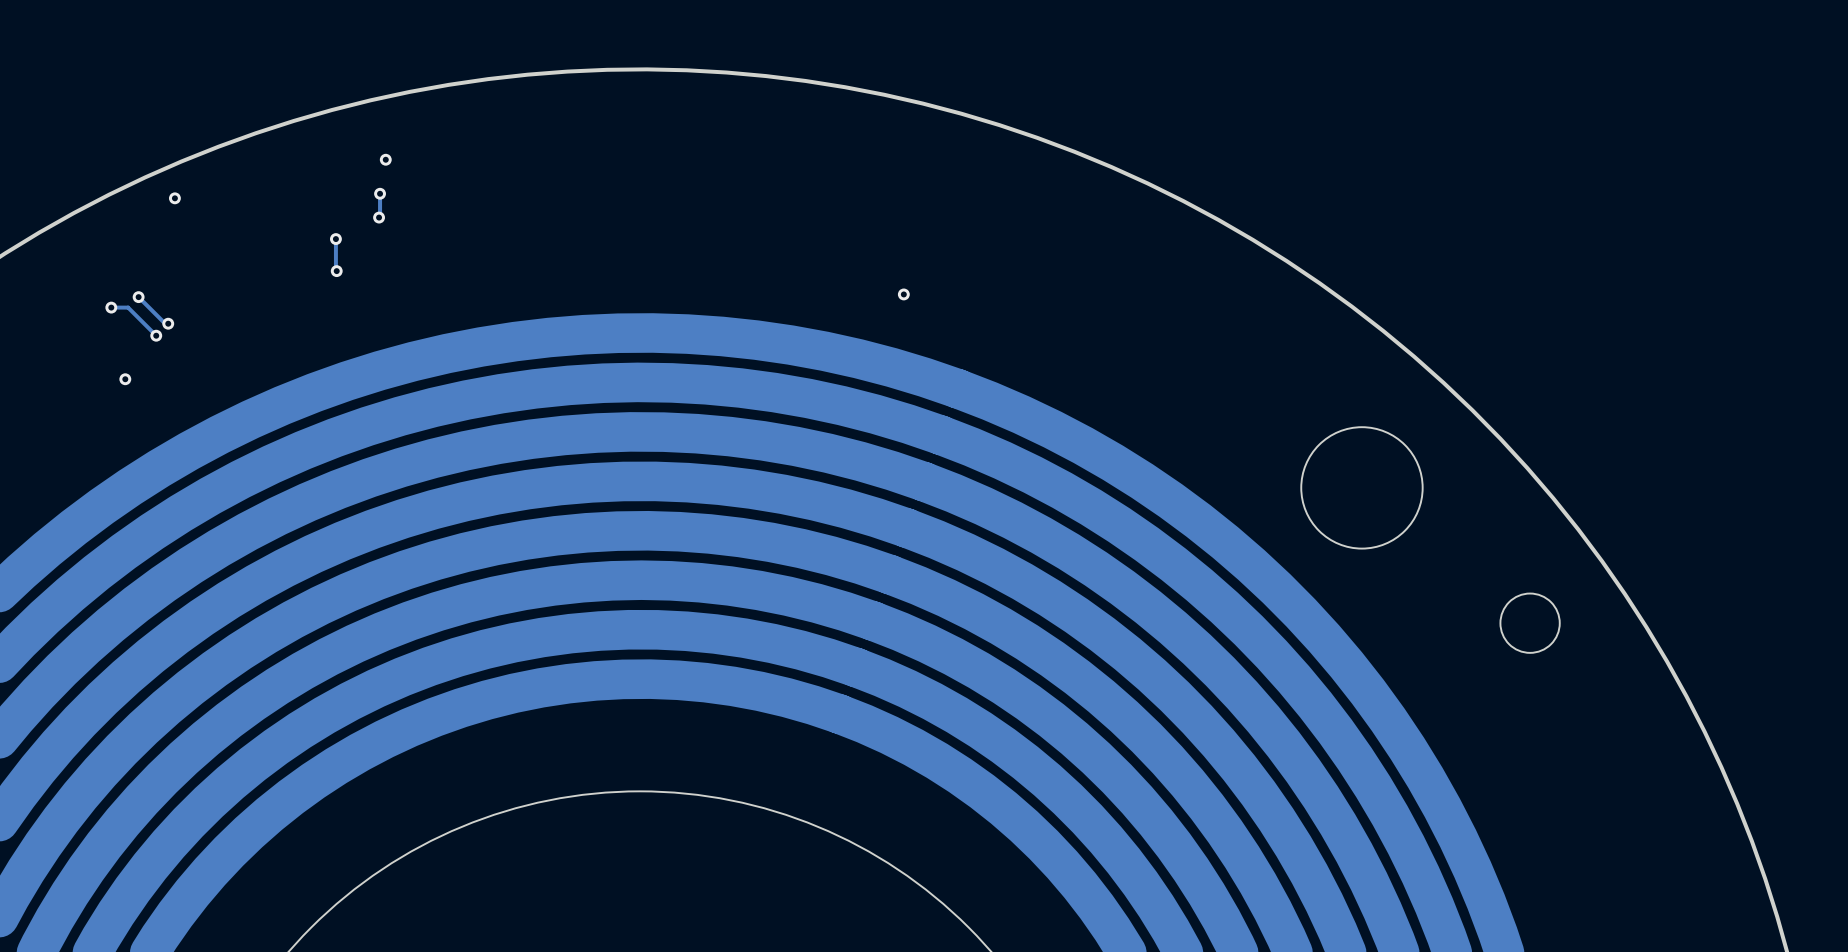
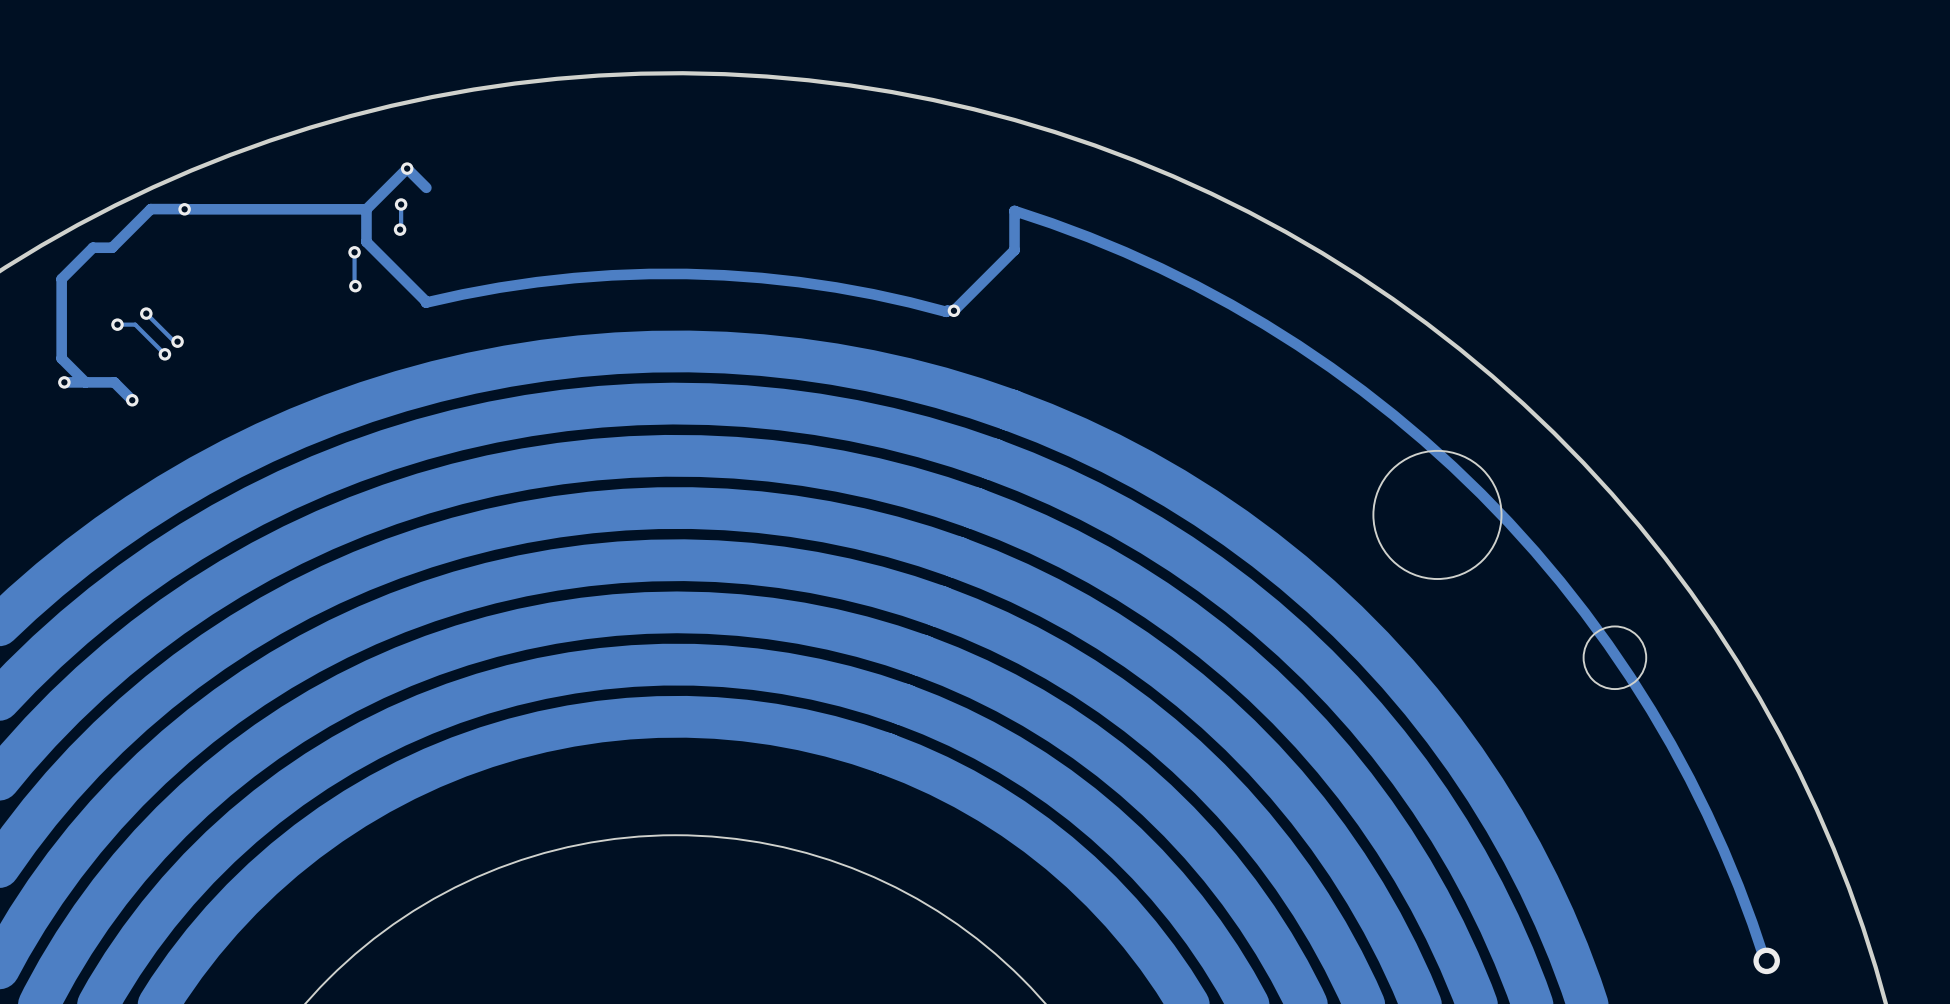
track: none -> (426, 187) (407, 168) (366, 209)
track: none -> (184, 209) (150, 209) (112, 247) (92, 247) (61, 279) (61, 358) (85, 382)
track: none -> (366, 209) (366, 241) (426, 302) (536, 282) (611, 275) (686, 273) (799, 282) (873, 294) (946, 311) (953, 310) (1014, 250) (1014, 210) (1088, 237) (1196, 285) (1298, 345) (1393, 415) (1481, 494) (1560, 581) (1608, 644) (1671, 744) (1723, 850) (1765, 960)
track: none -> (366, 209) (184, 209)
track: none -> (64, 382) (114, 382) (132, 400)
via: none -> (64, 382)
via: none -> (1766, 960)

